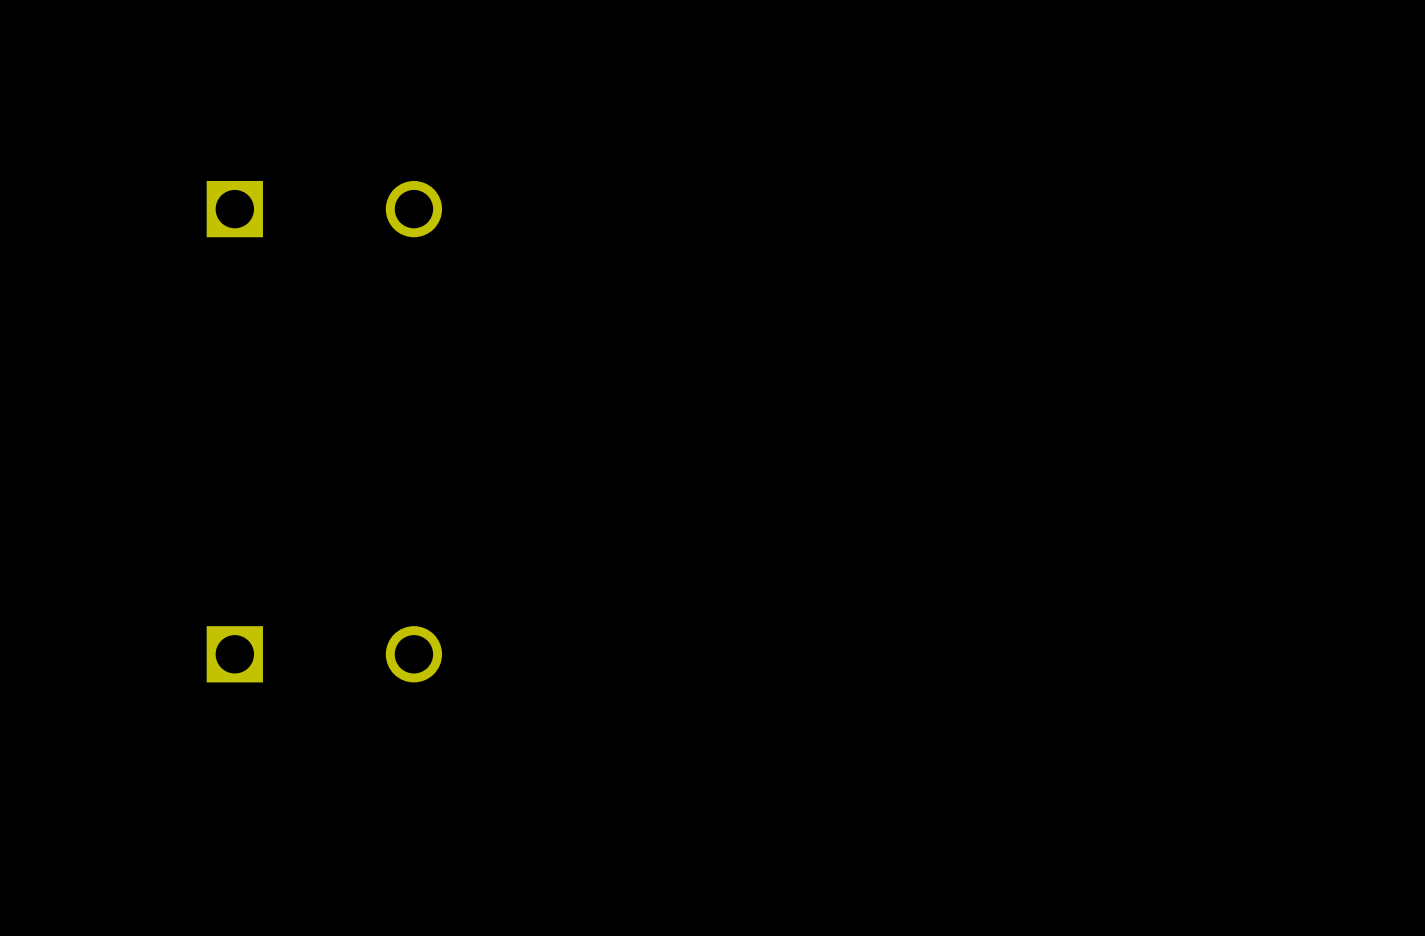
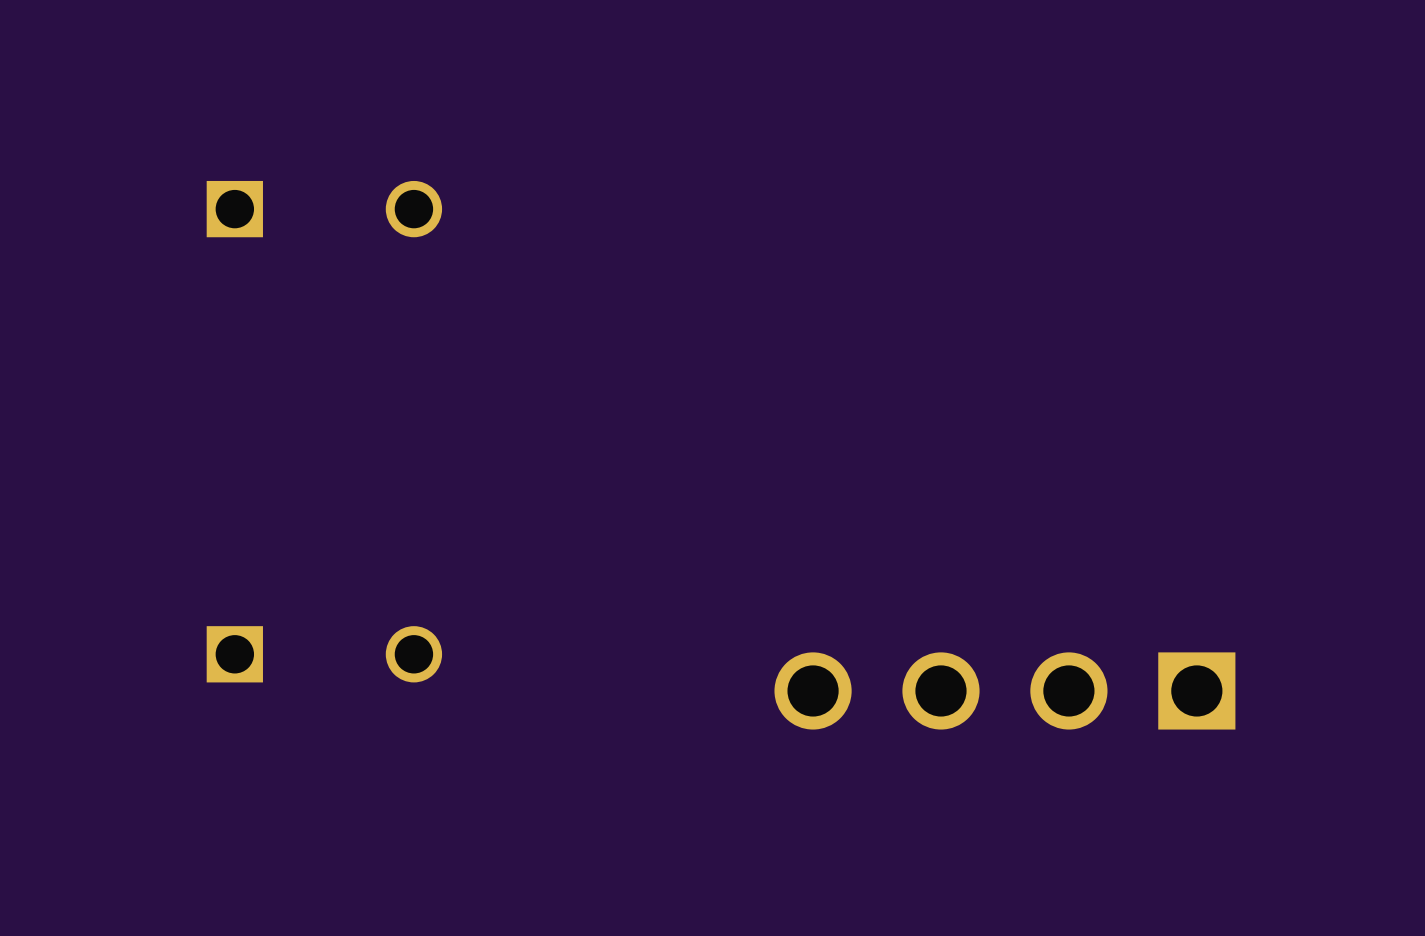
part: none -> (1004, 690)

